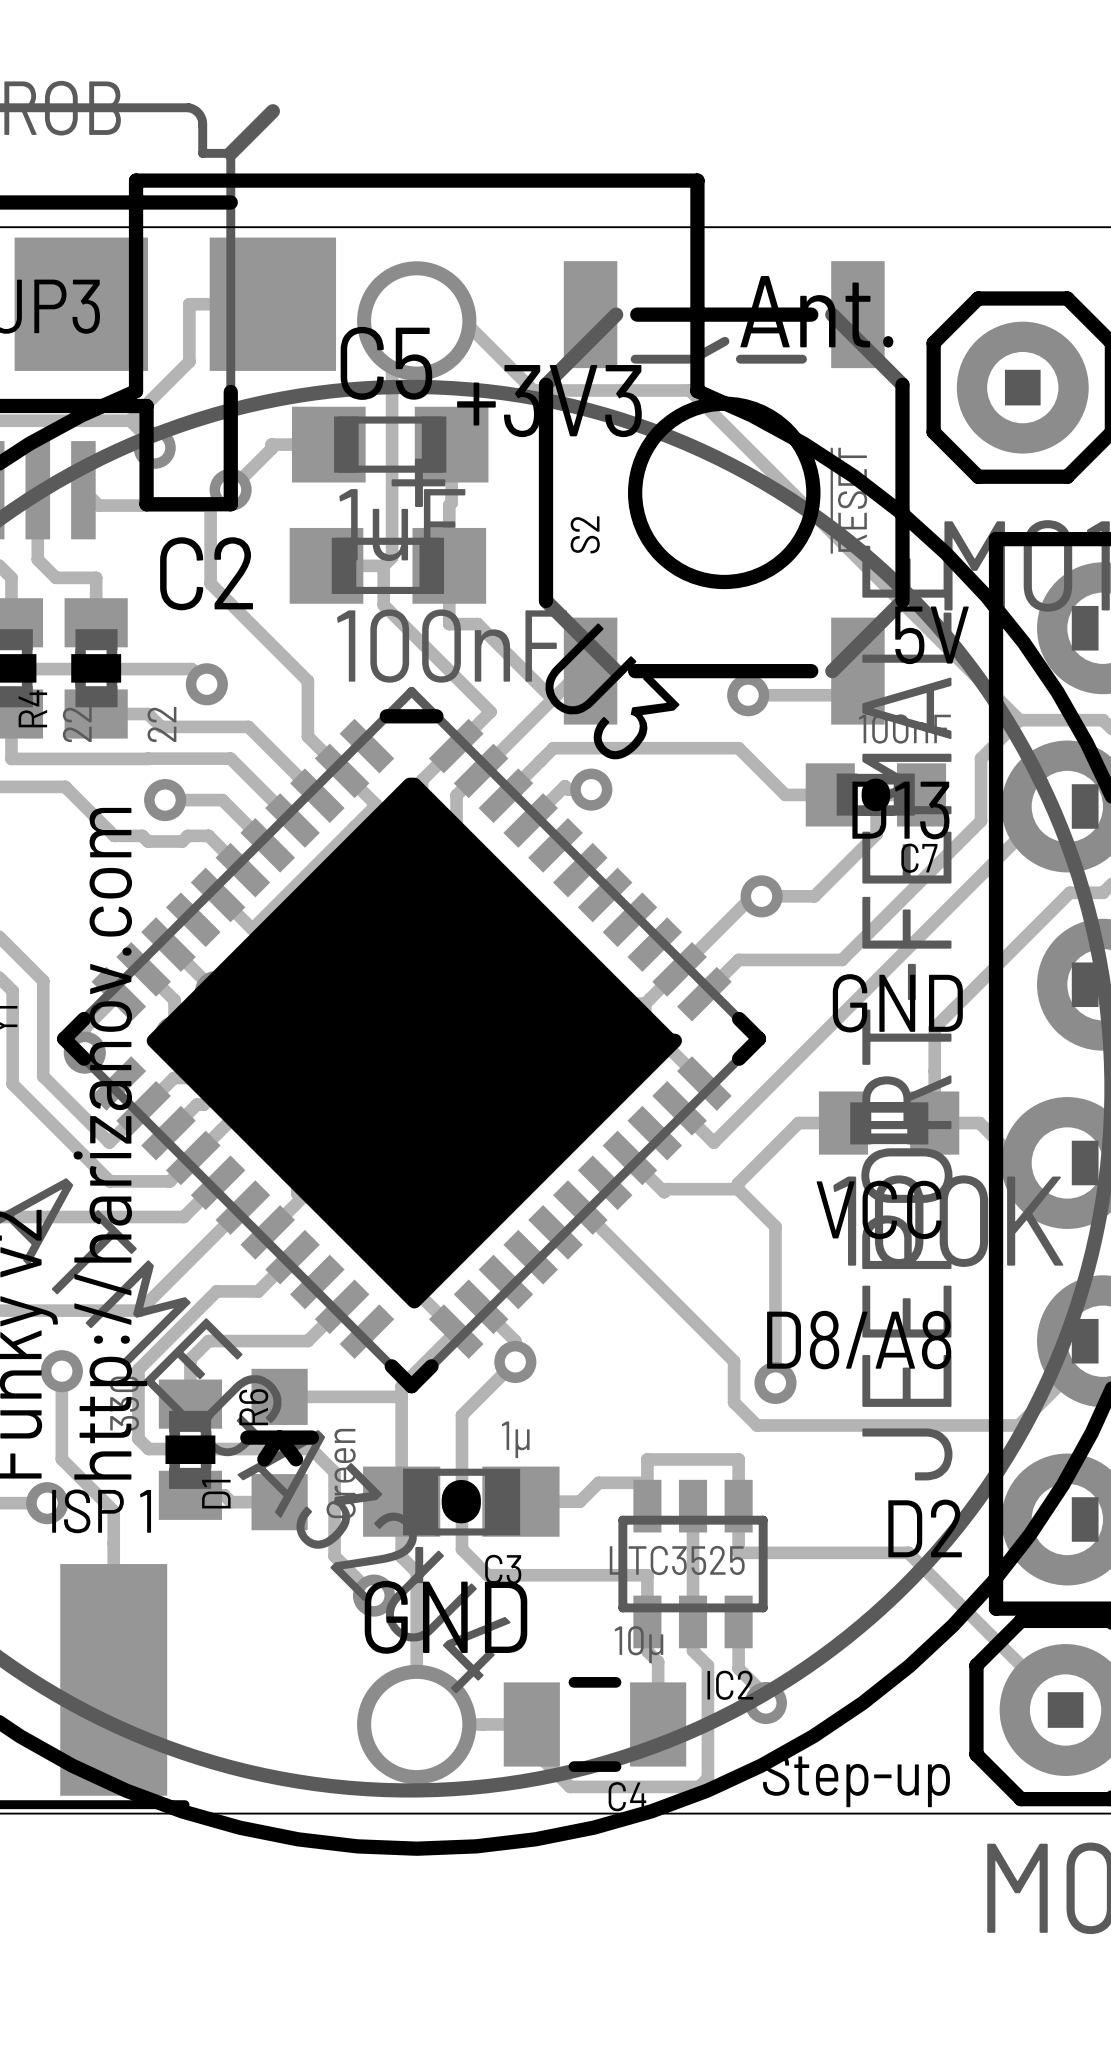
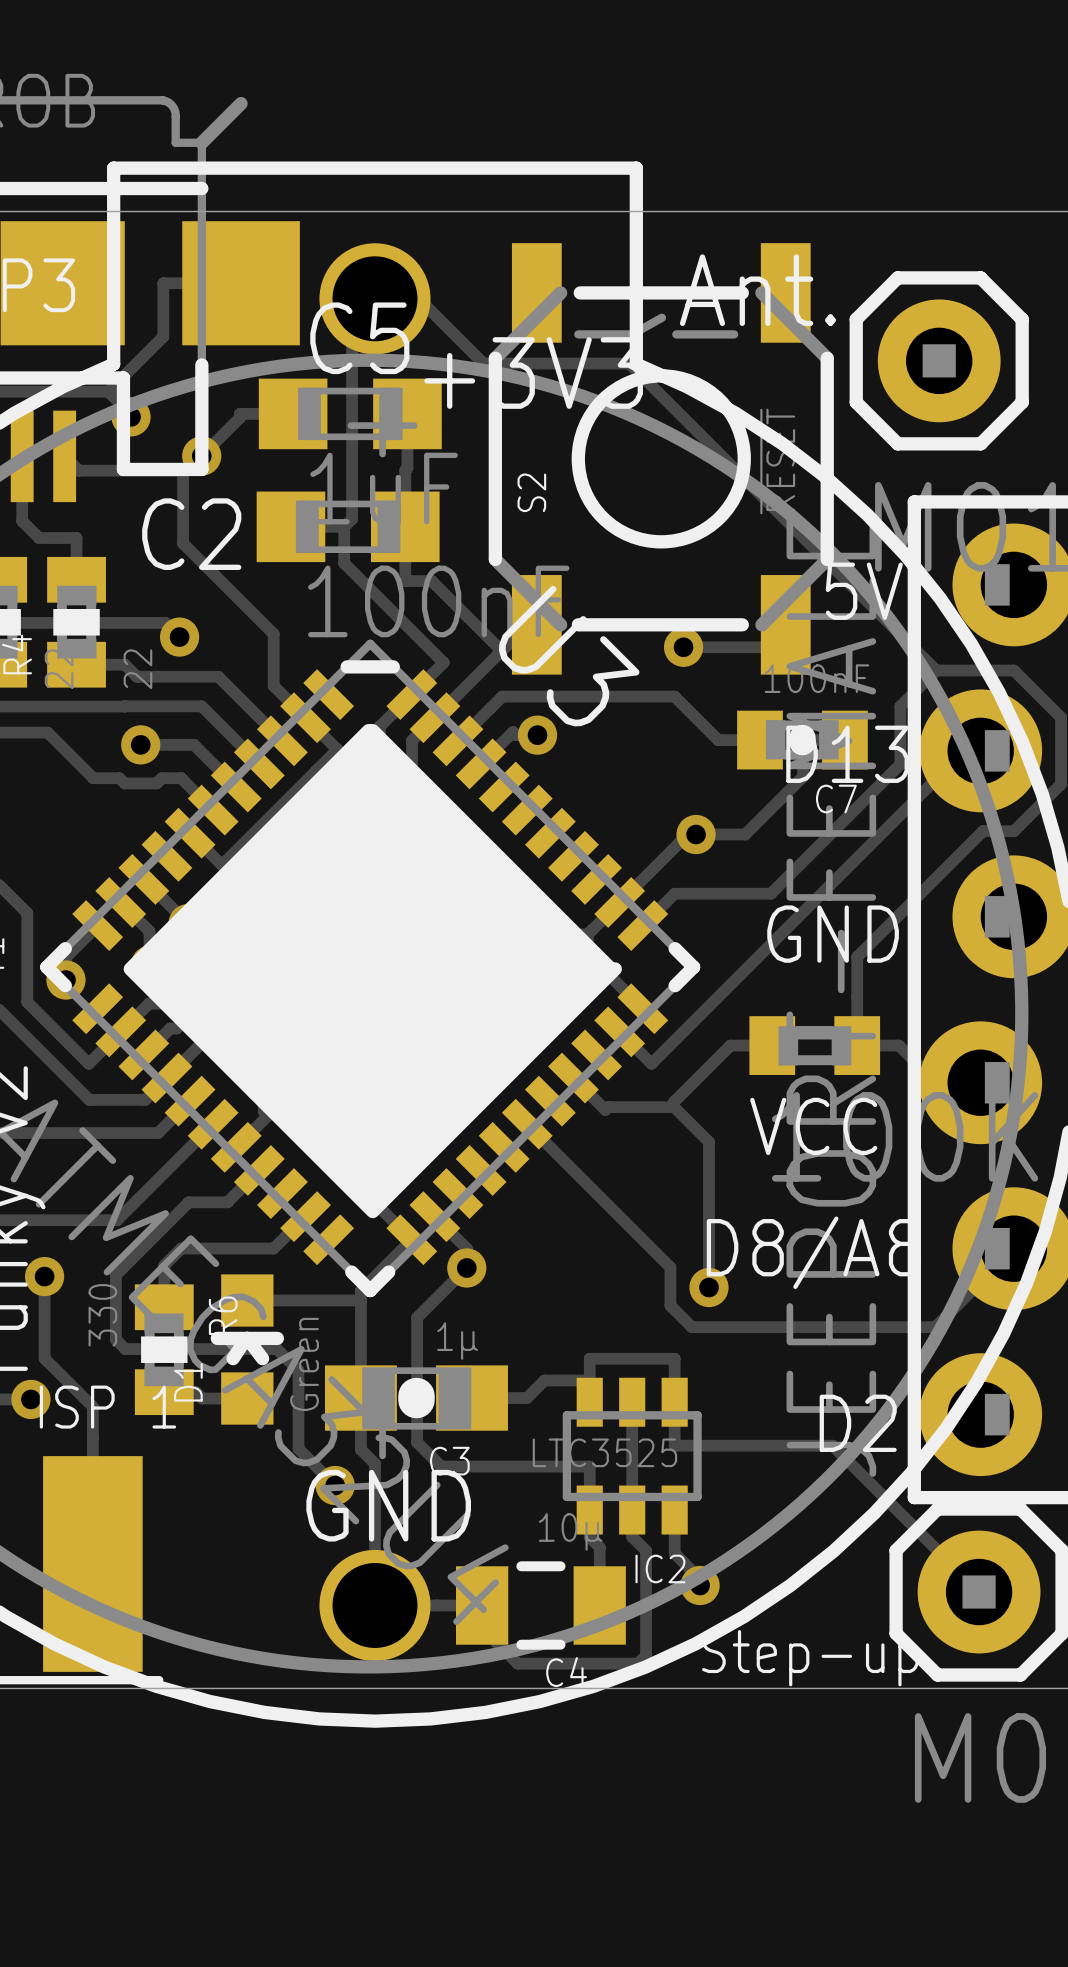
text: http://harizanov.com (110, 1143) -> none

